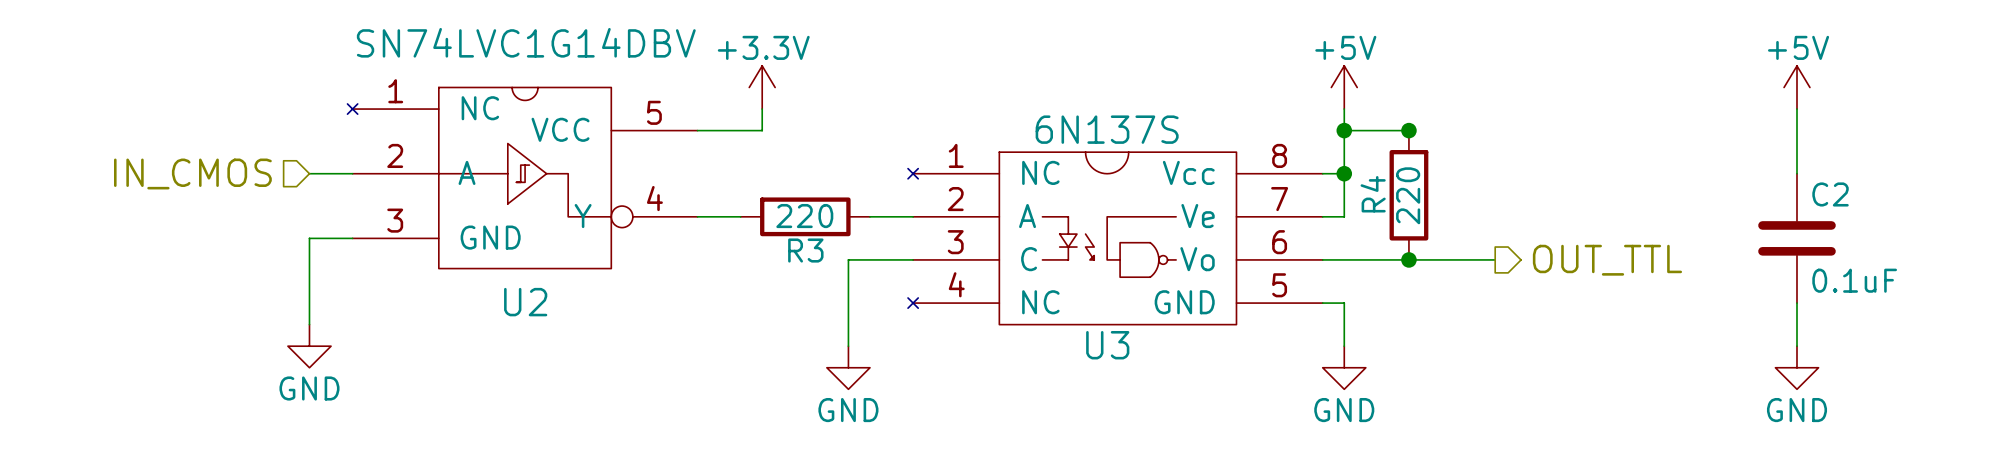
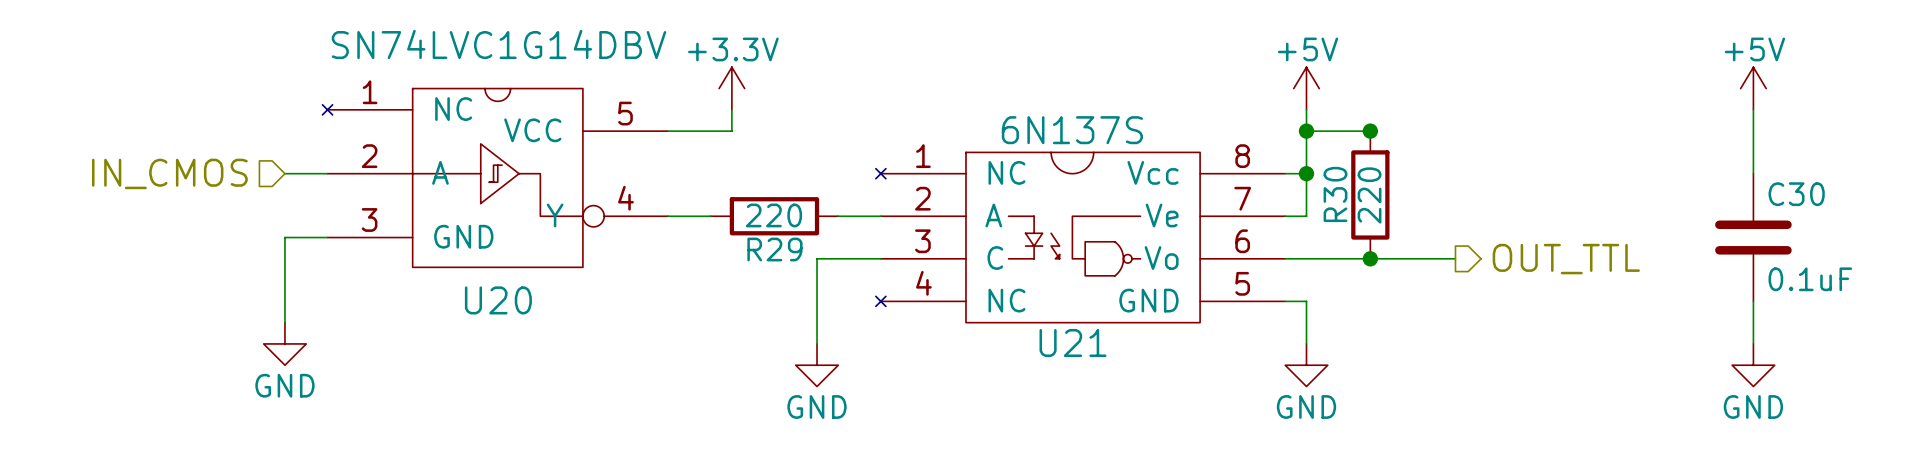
R4 name: R4 (1373, 194) -> R30 (1335, 194)
C2 name: C2 (1830, 194) -> C30 (1796, 194)
R3 name: R3 (805, 250) -> R29 (774, 249)
U2 name: U2 (525, 302) -> U20 (498, 300)
U3 name: U3 (1107, 345) -> U21 (1073, 342)

